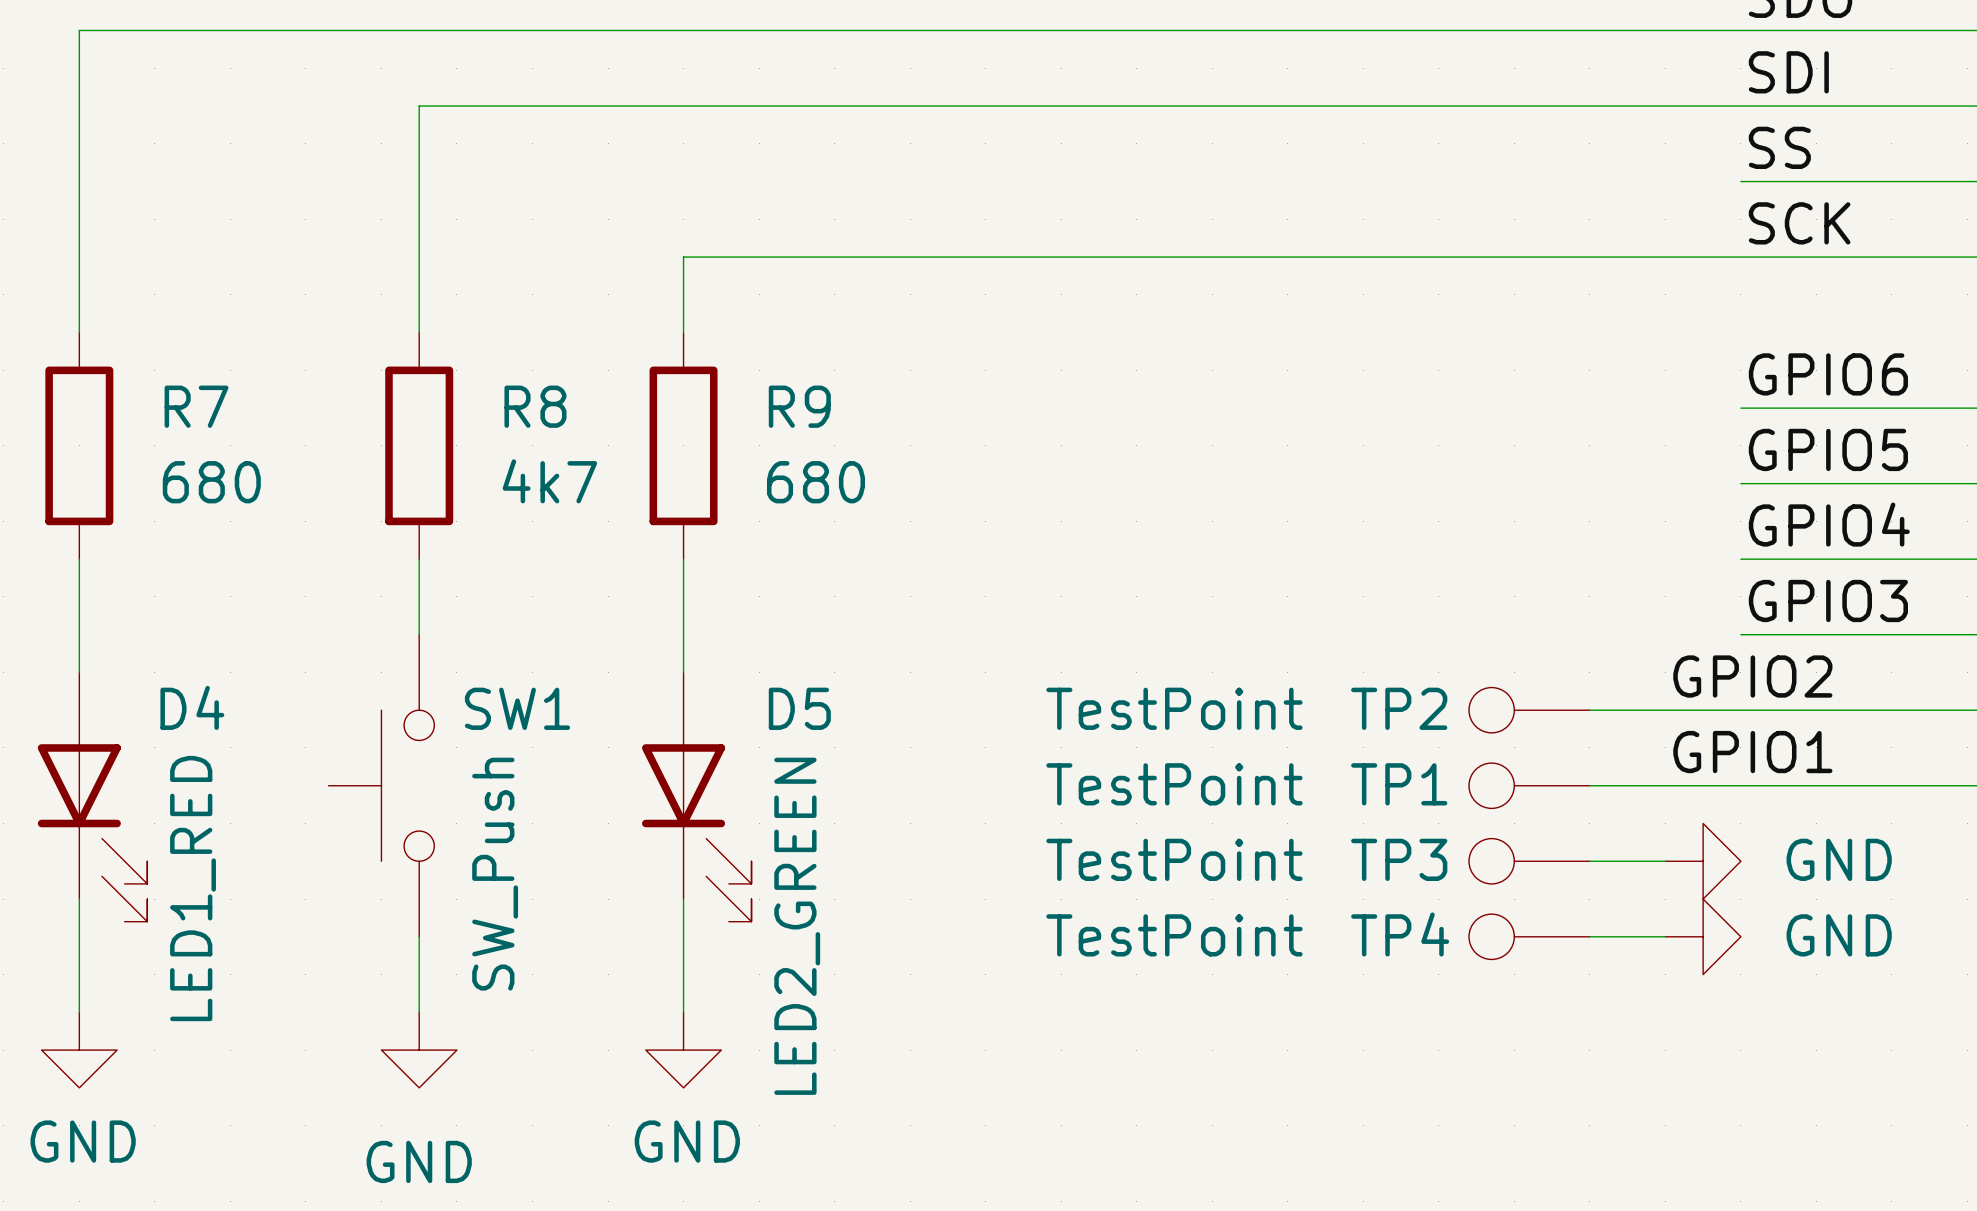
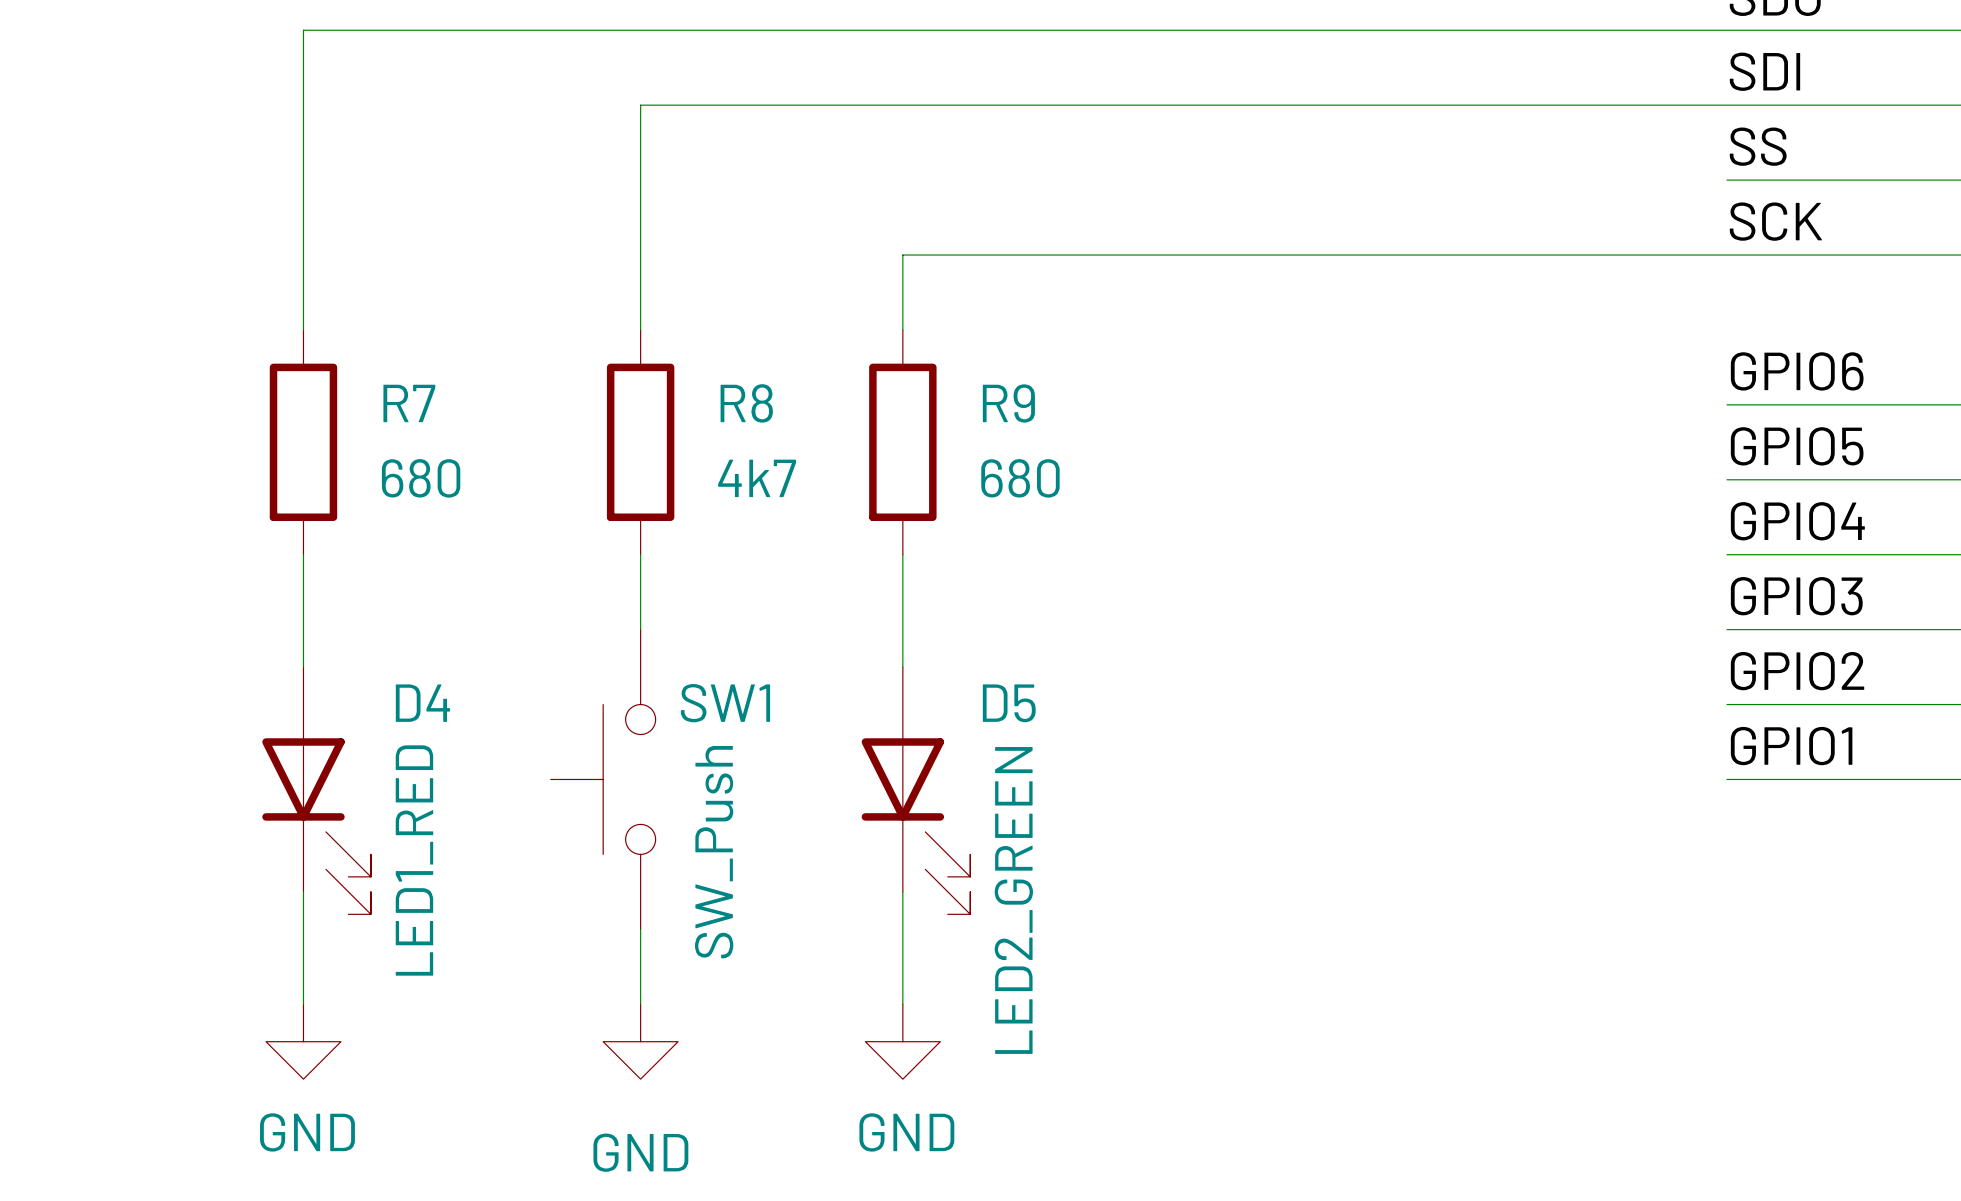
wire: (305, 30) (79, 30) (79, 332) -> (303, 30) (303, 329)
wire: (645, 106) (419, 106) (419, 332) -> (640, 105) (640, 329)
wire: (910, 257) (683, 257) (683, 332) -> (902, 255) (902, 329)
R7 position: (79, 445) -> (303, 442)
R8 position: (419, 445) -> (640, 442)
R9 position: (683, 445) -> (902, 442)
wire: (79, 559) (79, 672) -> (303, 554) (303, 667)
wire: (419, 559) (419, 634) -> (640, 554) (640, 629)
wire: (683, 559) (683, 672) -> (902, 554) (902, 667)
label position: GPIO2 (1752, 676) -> GPIO2 (1797, 671)
TP2: TestPoint (1529, 710) -> none
wire: (1589, 710) (1740, 710) -> none
label position: GPIO1 (1752, 752) -> GPIO1 (1791, 746)
SW1 position: (381, 785) -> (603, 779)
TP1: TestPoint (1529, 785) -> none
wire: (1589, 785) (1740, 785) -> none
D4 position: (92, 797) -> (316, 790)
D5 position: (696, 797) -> (915, 790)
TP3: TestPoint (1529, 861) -> none
wire: (1589, 861) (1665, 861) -> none
power symbol: GND (1703, 861) -> none
wire: (79, 899) (79, 1012) -> (303, 891) (303, 1004)
wire: (683, 899) (683, 1012) -> (902, 891) (902, 1004)
wire: (419, 936) (419, 1012) -> (640, 929) (640, 1004)
TP4: TestPoint (1529, 936) -> none
wire: (1589, 936) (1665, 936) -> none
power symbol: GND (1703, 936) -> none
power symbol: GND (79, 1050) -> none
power symbol: none -> GND (303, 1041)
power symbol: GND (419, 1050) -> none
power symbol position: GND (683, 1050) -> GND (640, 1041)
power symbol: none -> GND (902, 1041)
power symbol text position: GND (687, 1141) -> GND (640, 1152)

